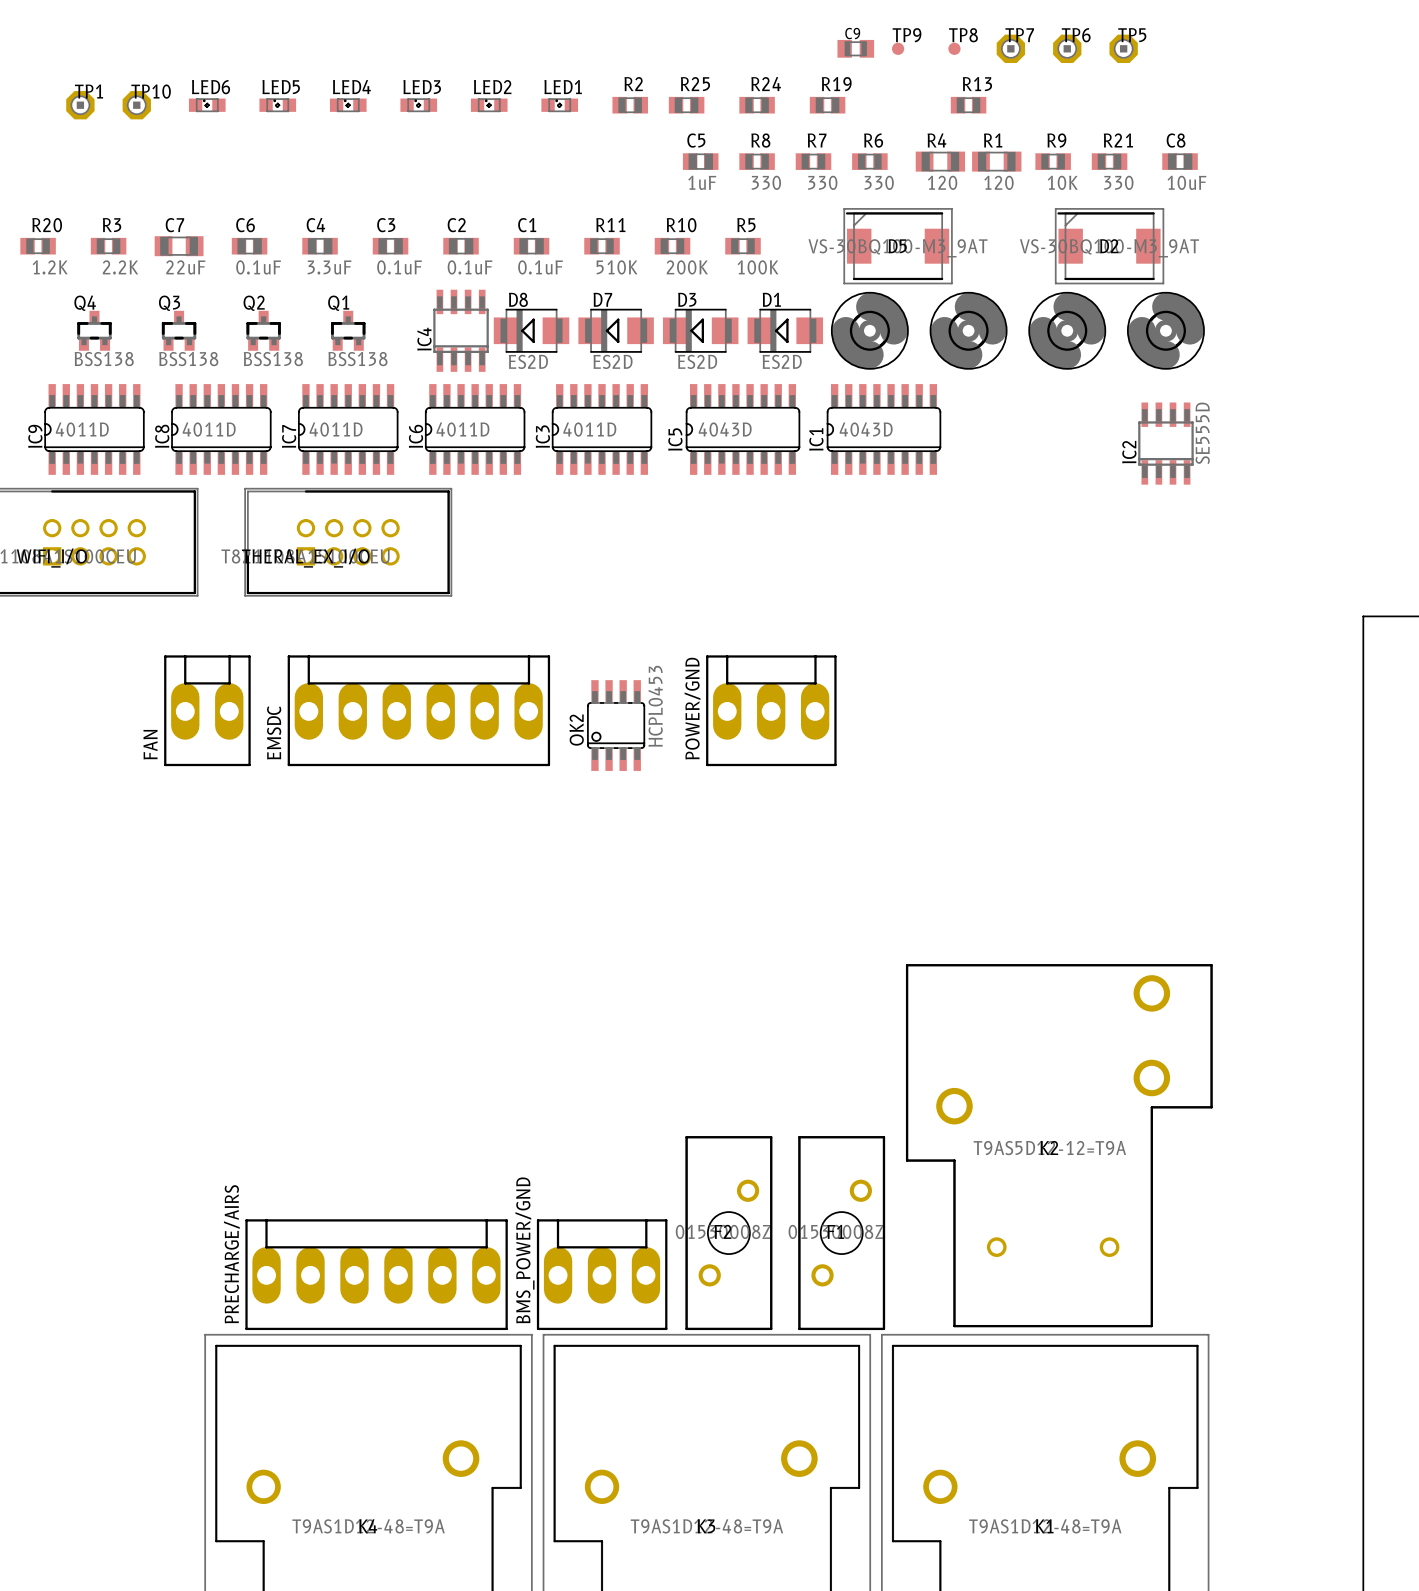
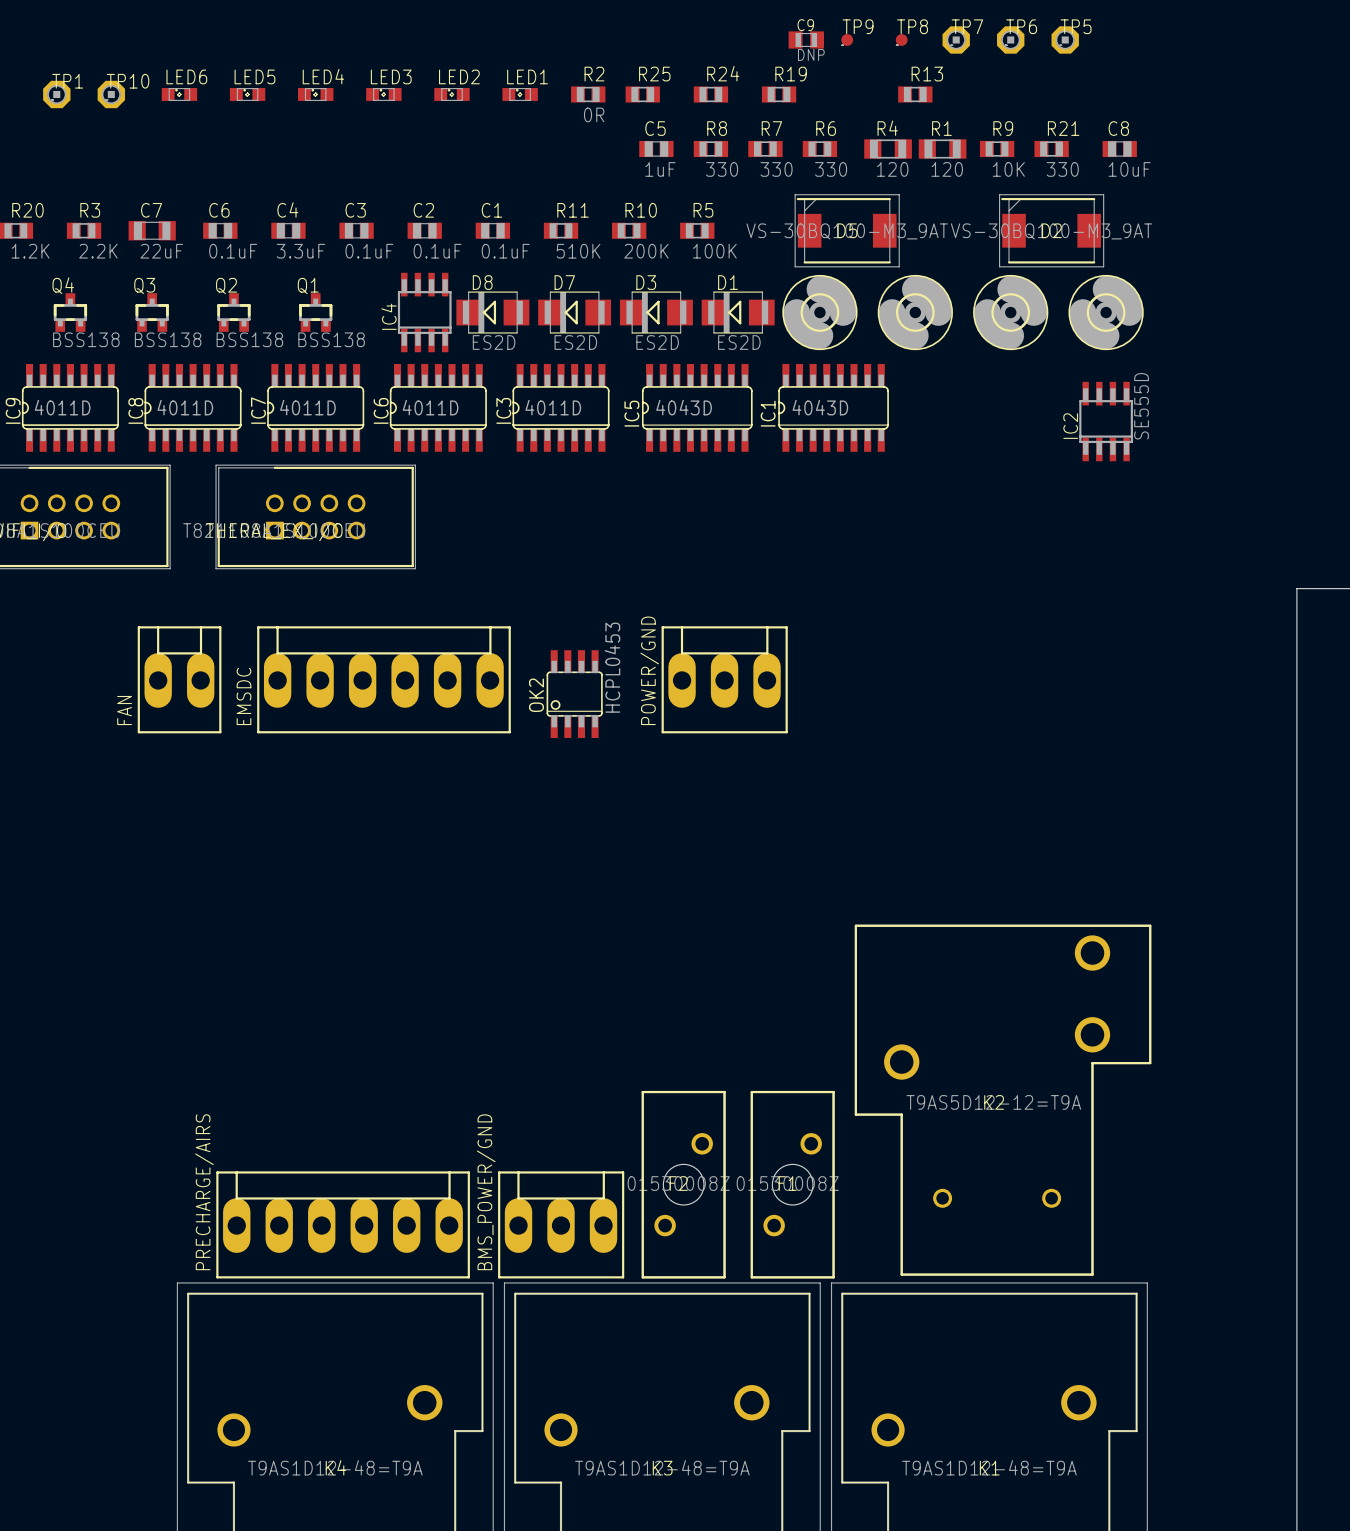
C9 value: none -> DNP (811, 54)
R2 value: none -> 0R (594, 114)

